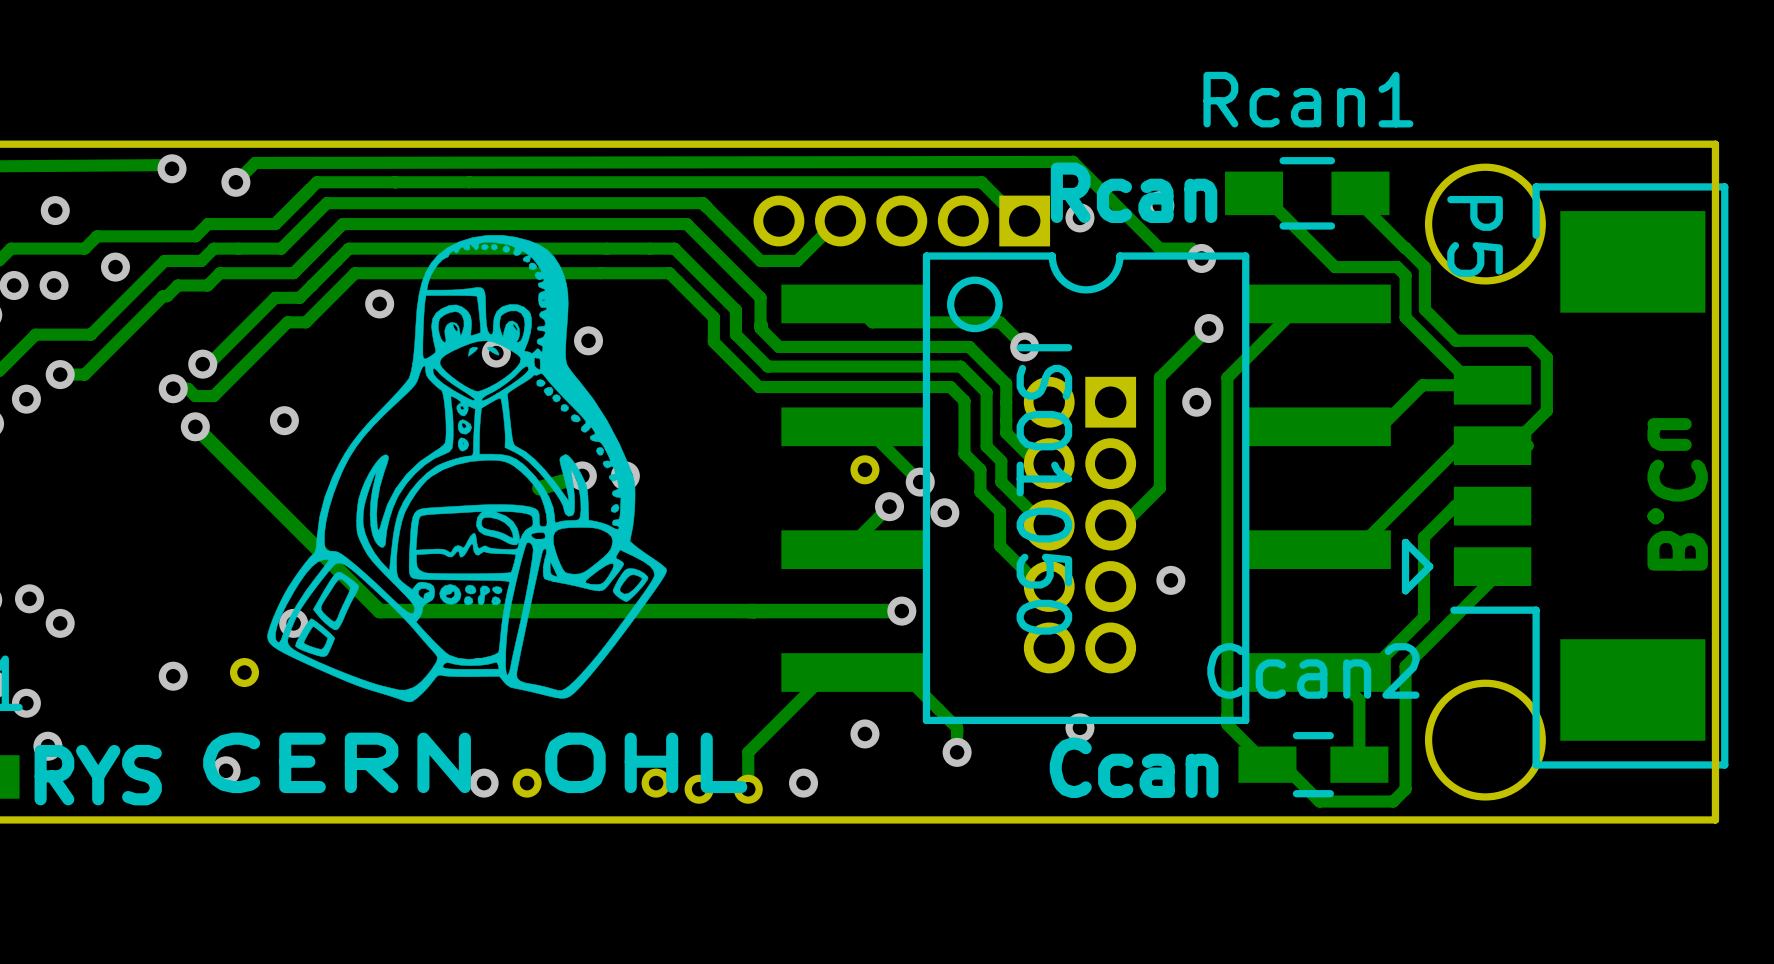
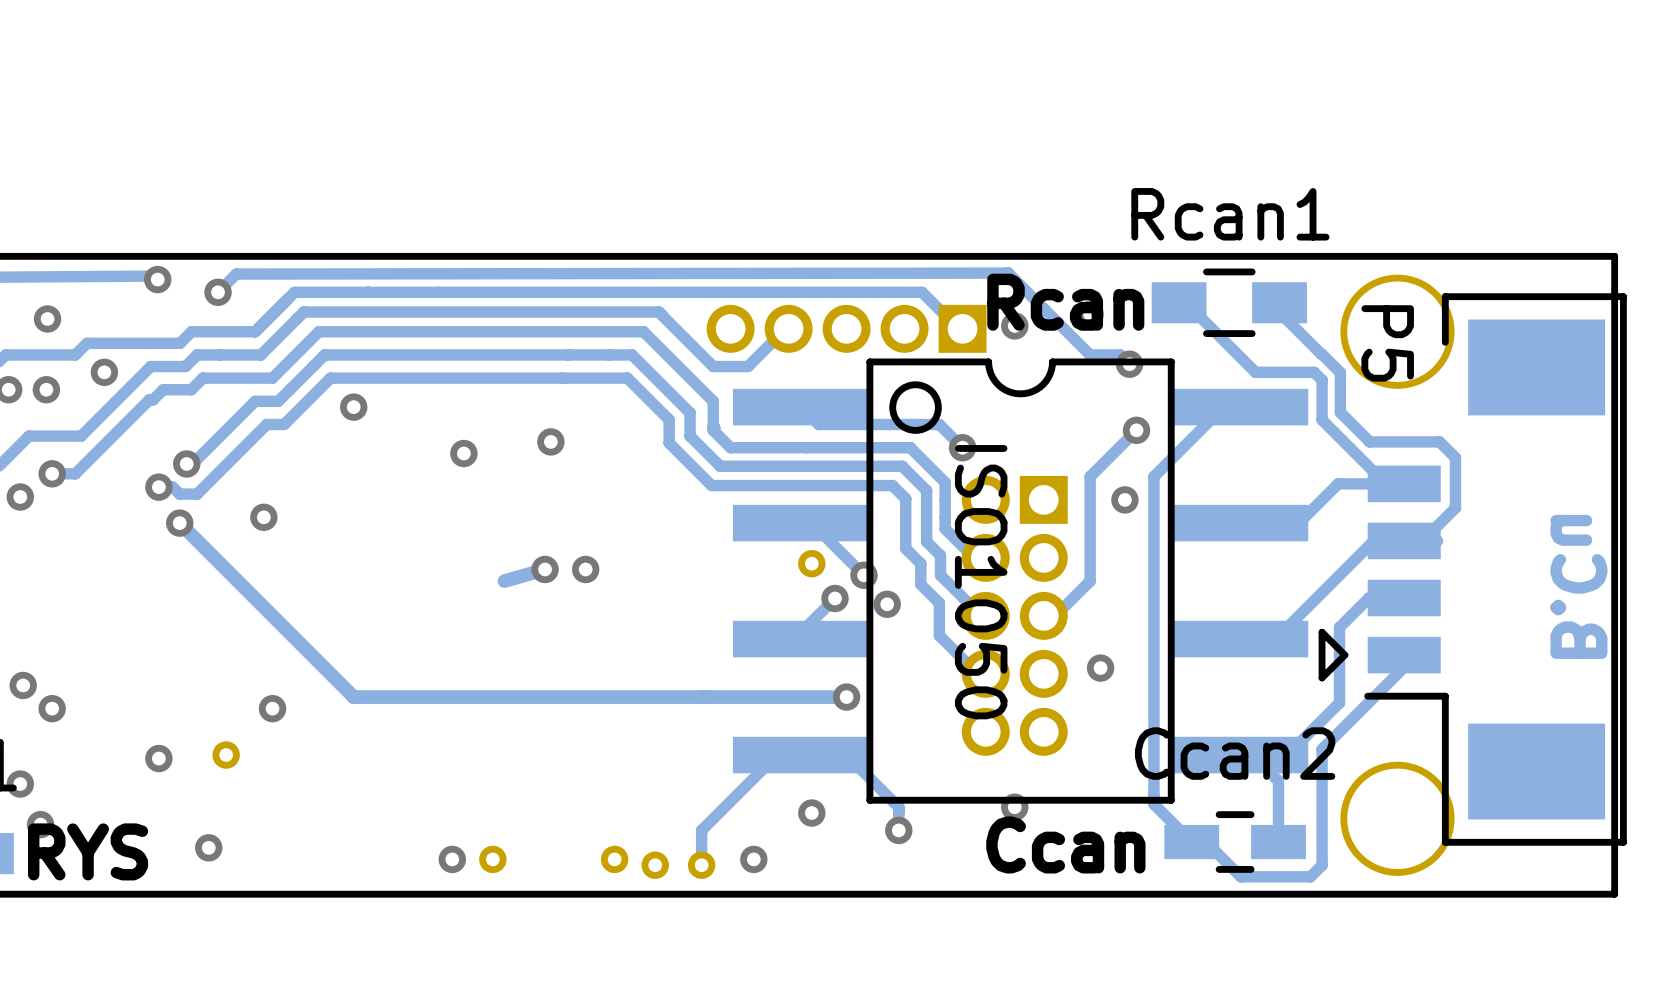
drawing: [267, 235, 667, 703] -> none
text: CERN OHL (475, 762) -> none

